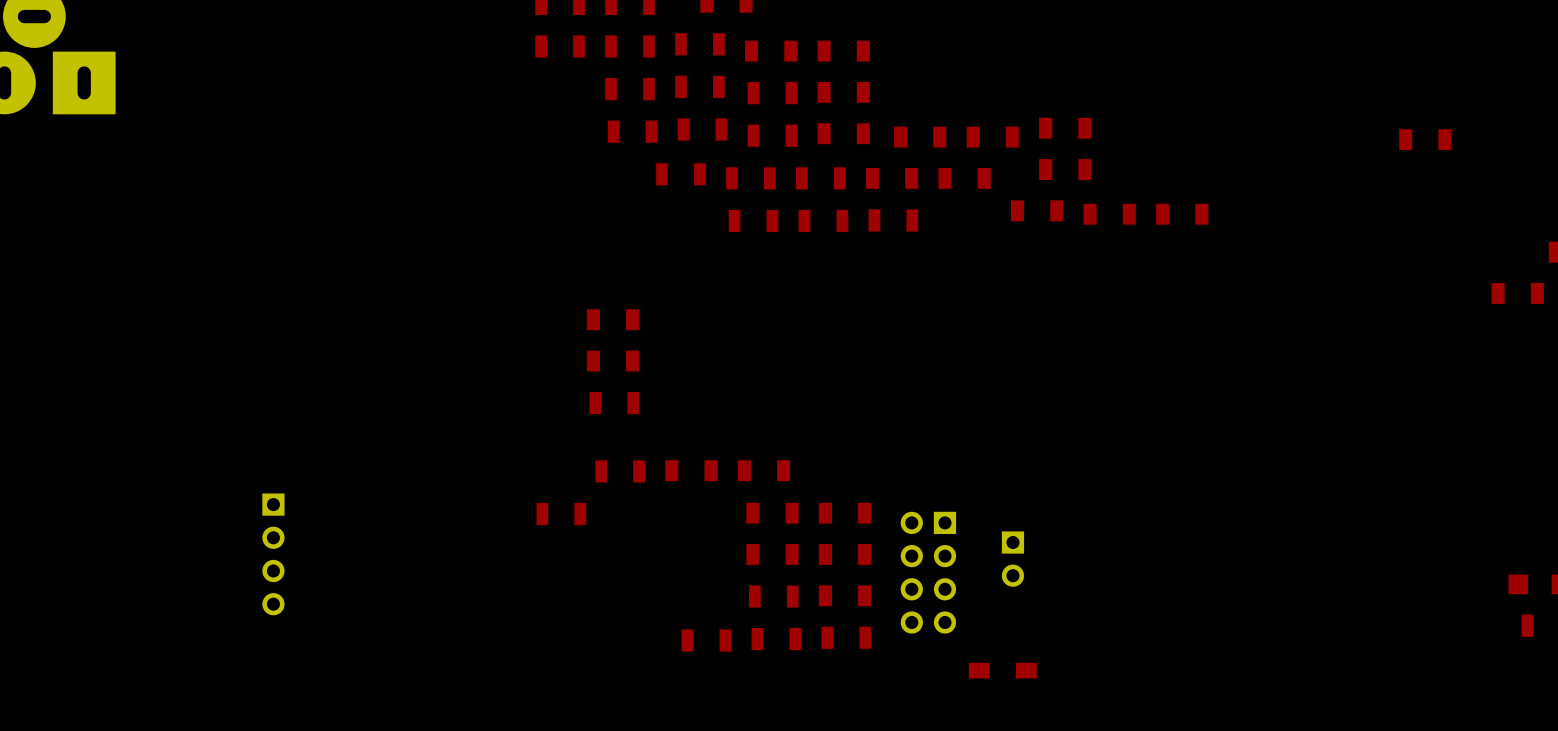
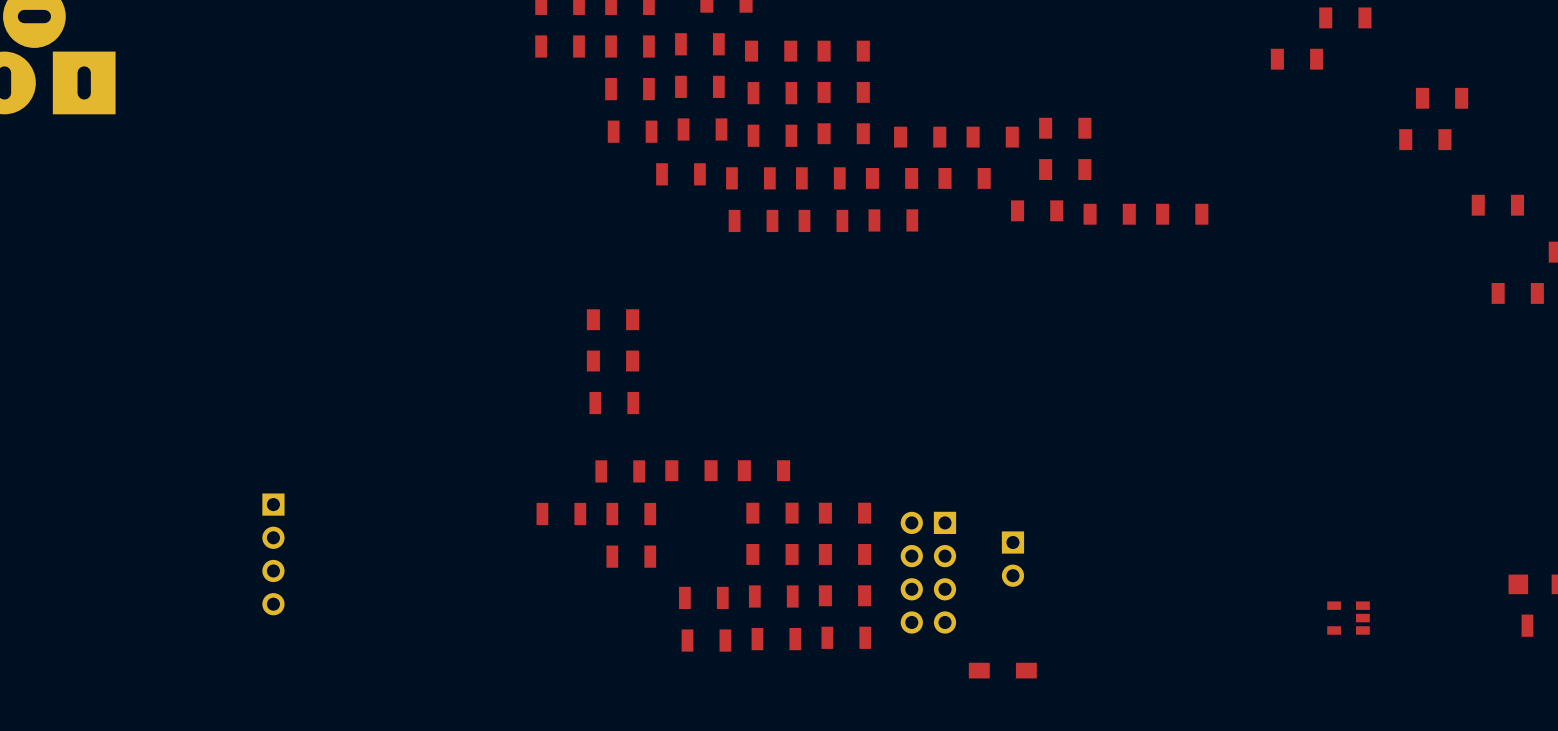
part: none -> (1345, 17)
part: none -> (1296, 59)
part: none -> (1442, 98)
part: none -> (1497, 205)
part: none -> (631, 514)
part: none -> (631, 556)
part: none -> (703, 597)
part: none -> (1348, 618)

